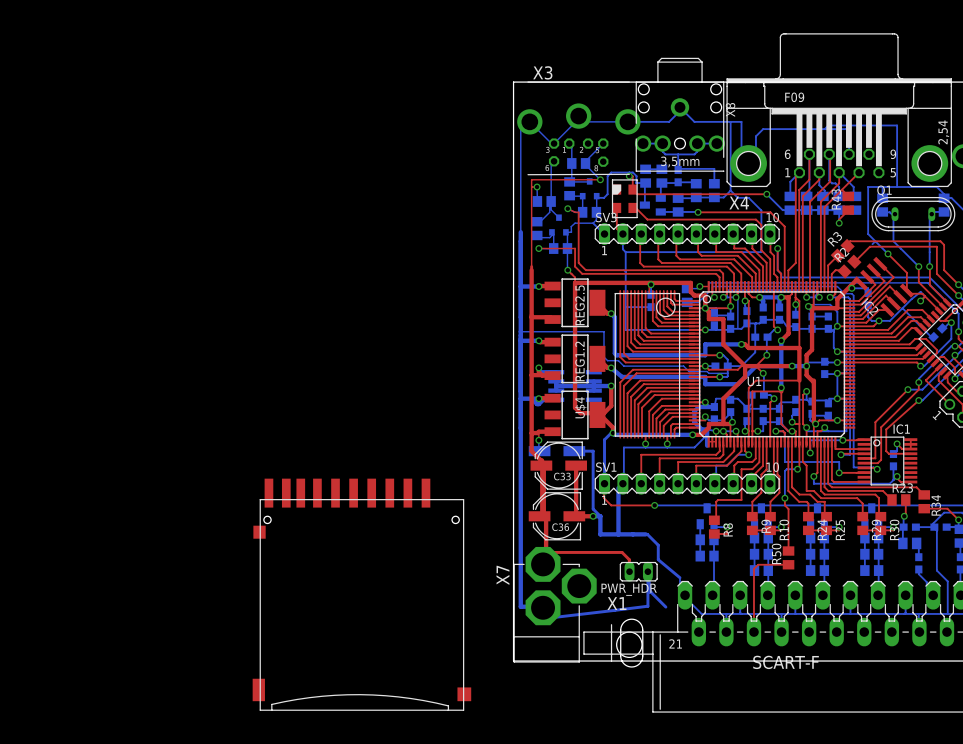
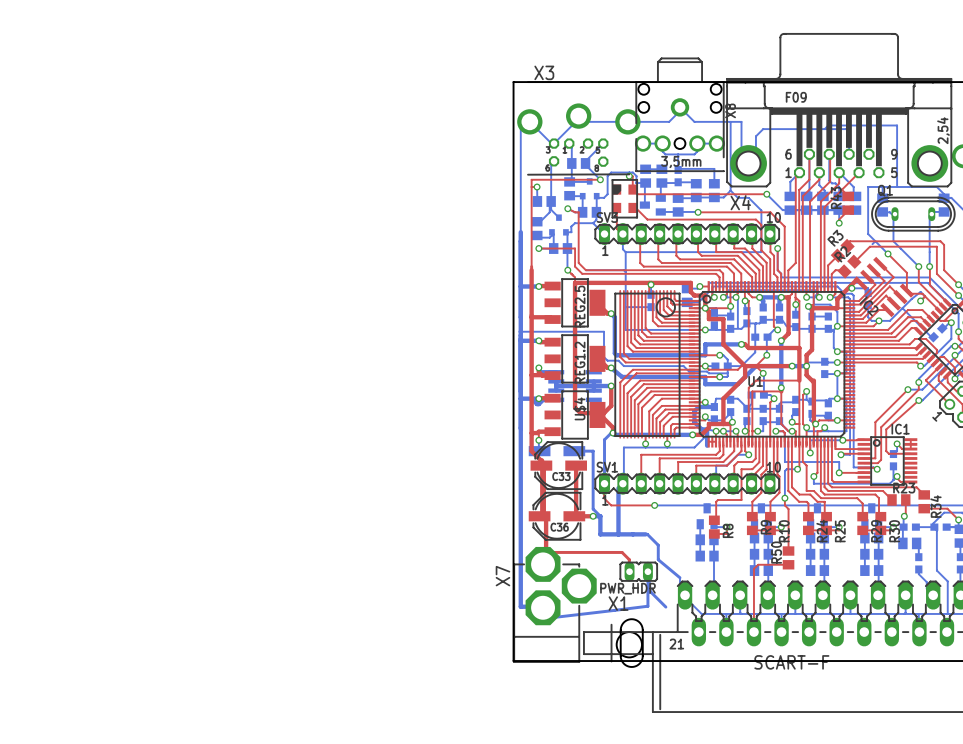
part: (361, 594) -> none

